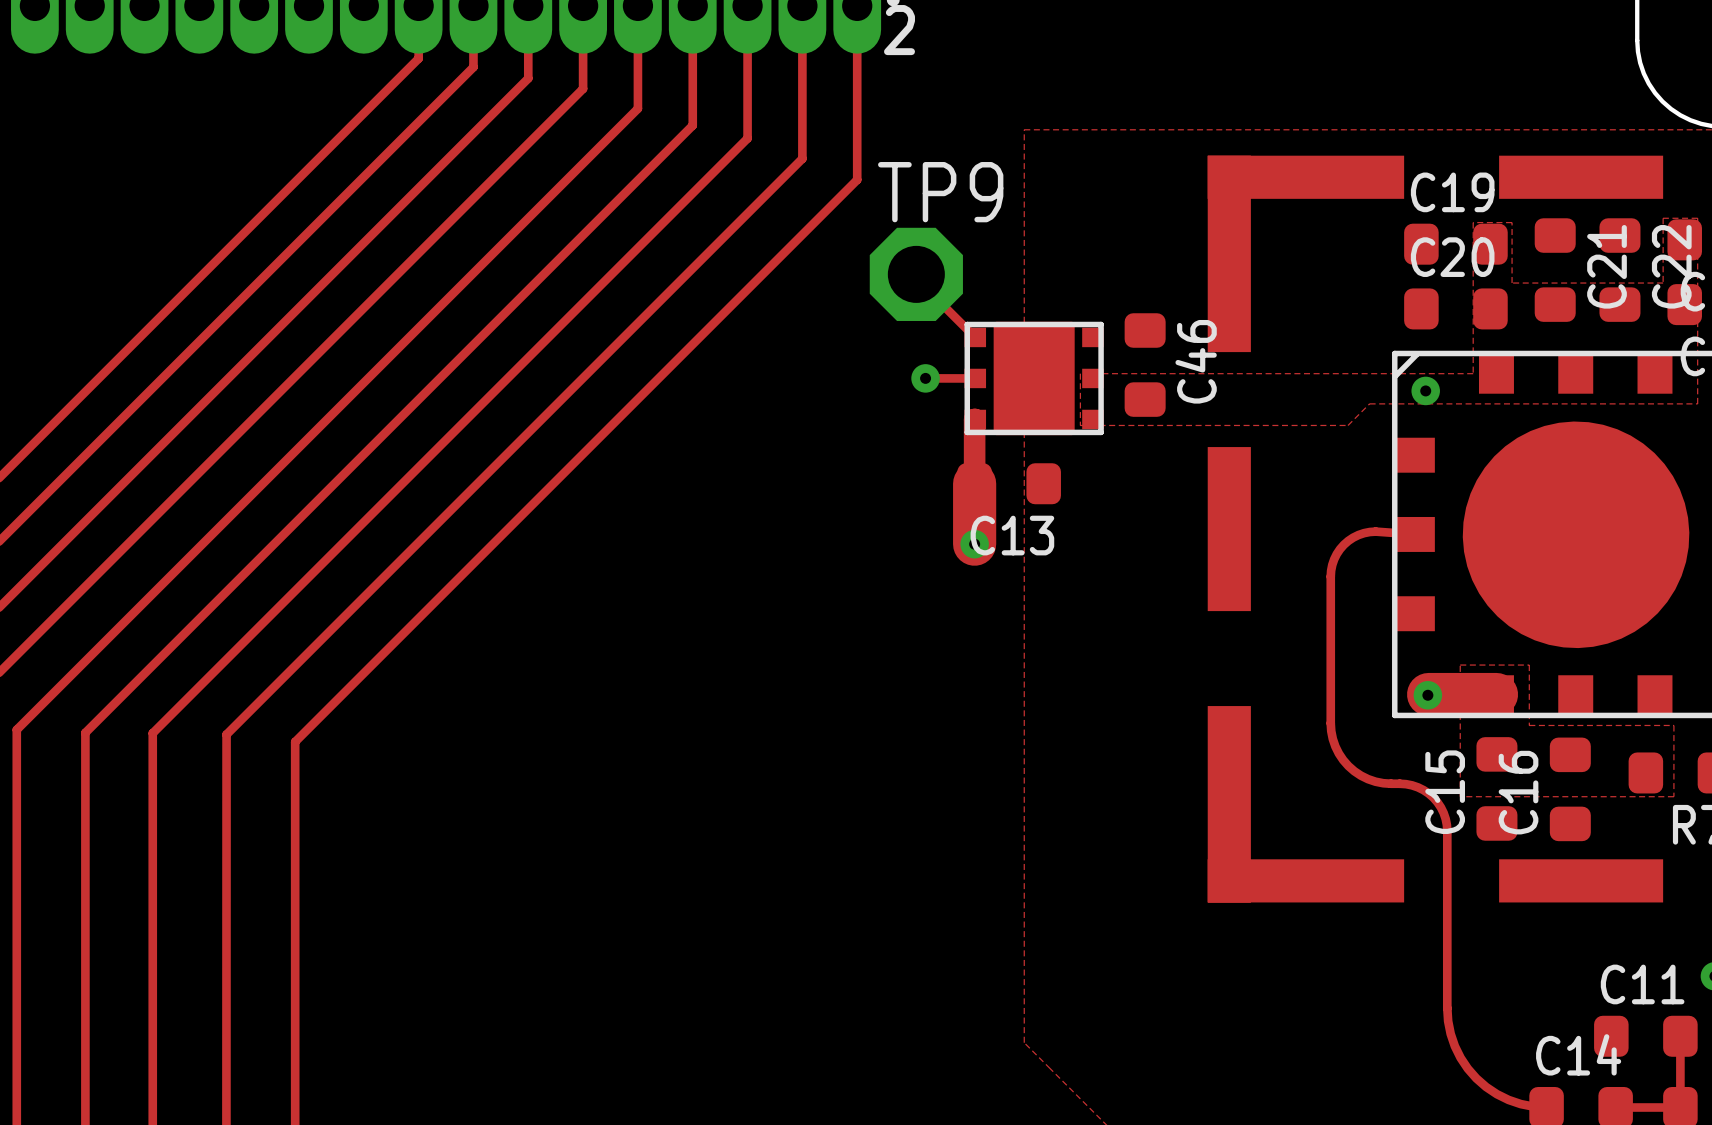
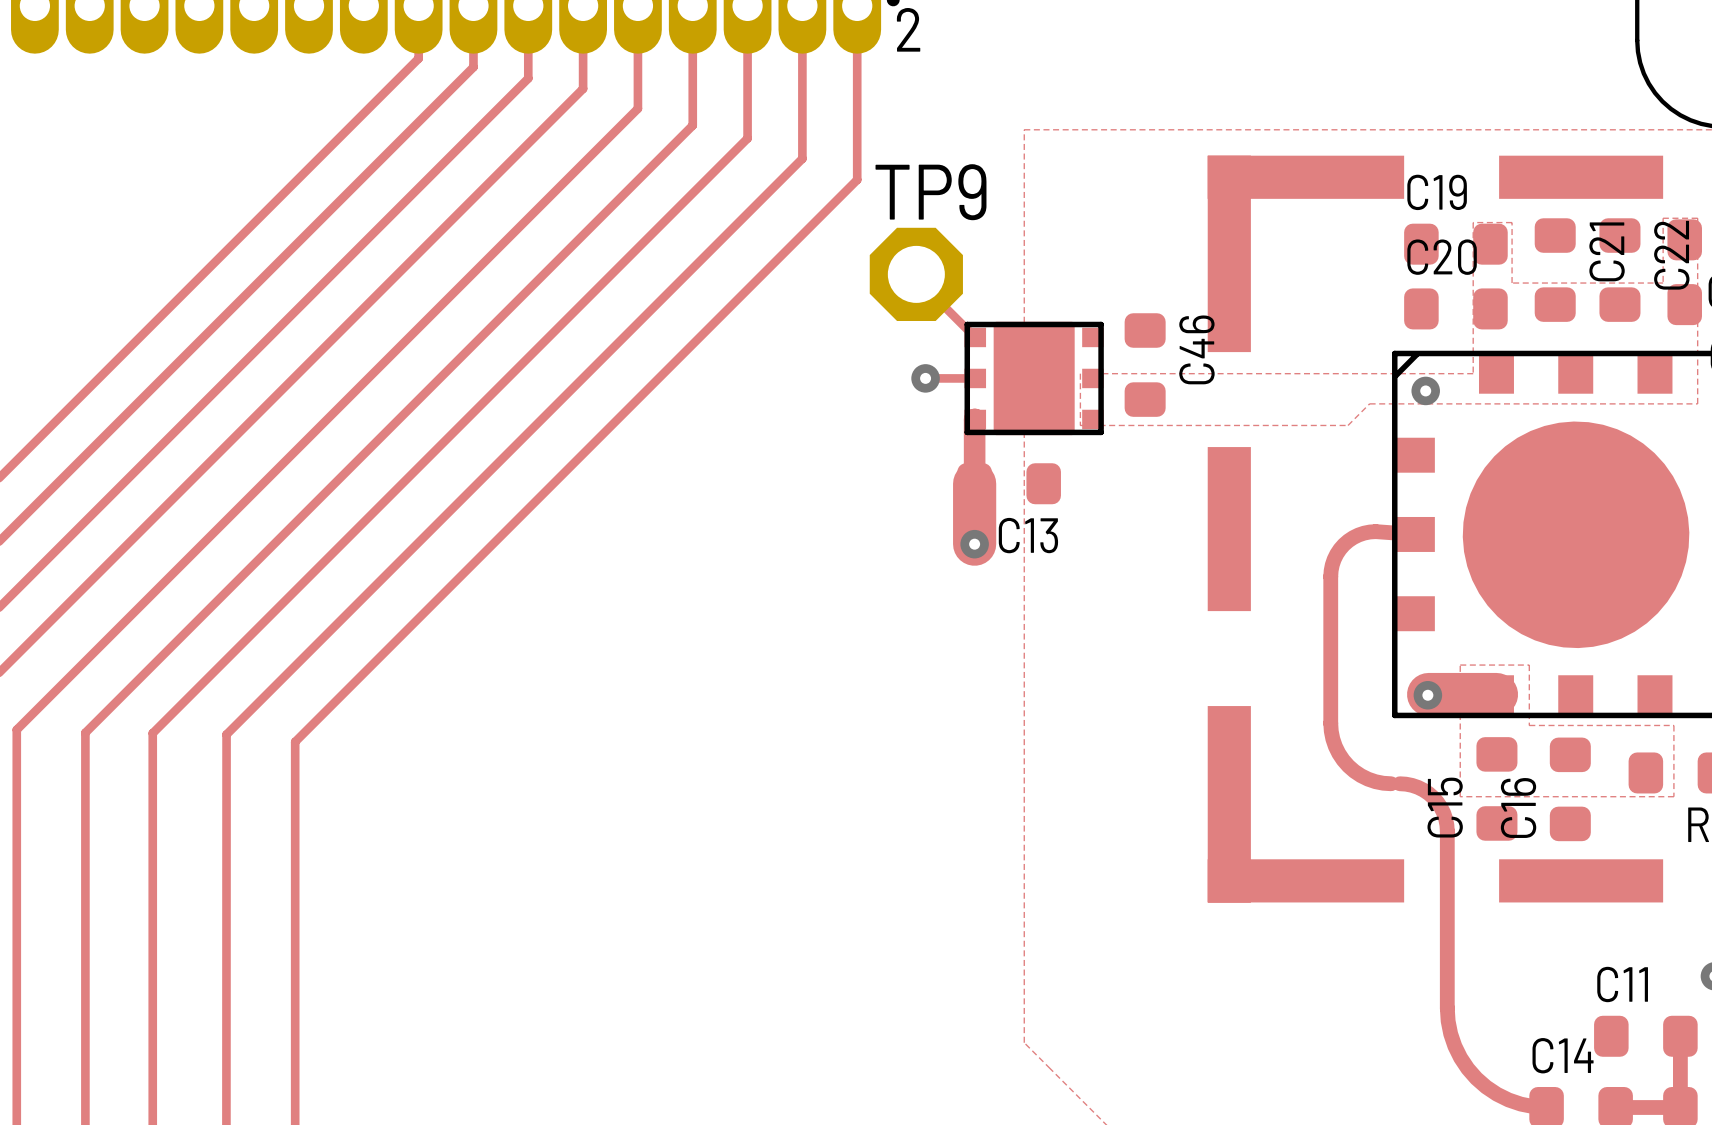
track width: thin (1415, 534) (1375, 531) (1358, 535) (1348, 540) (1340, 549) (1334, 559) (1331, 570) (1330, 723) (1332, 738) (1343, 760) (1354, 771) (1368, 779) (1391, 783) -> thick (1415, 534) (1375, 531) (1358, 535) (1348, 540) (1340, 549) (1334, 559) (1331, 570) (1330, 723) (1332, 738) (1343, 760) (1354, 771) (1368, 779) (1391, 783)
track width: thin (1399, 783) (1417, 787) (1428, 793) (1437, 802) (1445, 818) (1447, 831) (1447, 1008) (1448, 1021) (1454, 1046) (1467, 1068) (1486, 1086) (1508, 1099) (1533, 1106) (1546, 1107) -> thick (1399, 783) (1417, 787) (1428, 793) (1437, 802) (1445, 818) (1447, 831) (1447, 1008) (1448, 1021) (1454, 1046) (1467, 1068) (1486, 1086) (1508, 1099) (1533, 1106) (1546, 1107)
track width: thin (1680, 1036) (1680, 1107) (1615, 1107) -> thick (1680, 1036) (1680, 1107) (1615, 1107)

